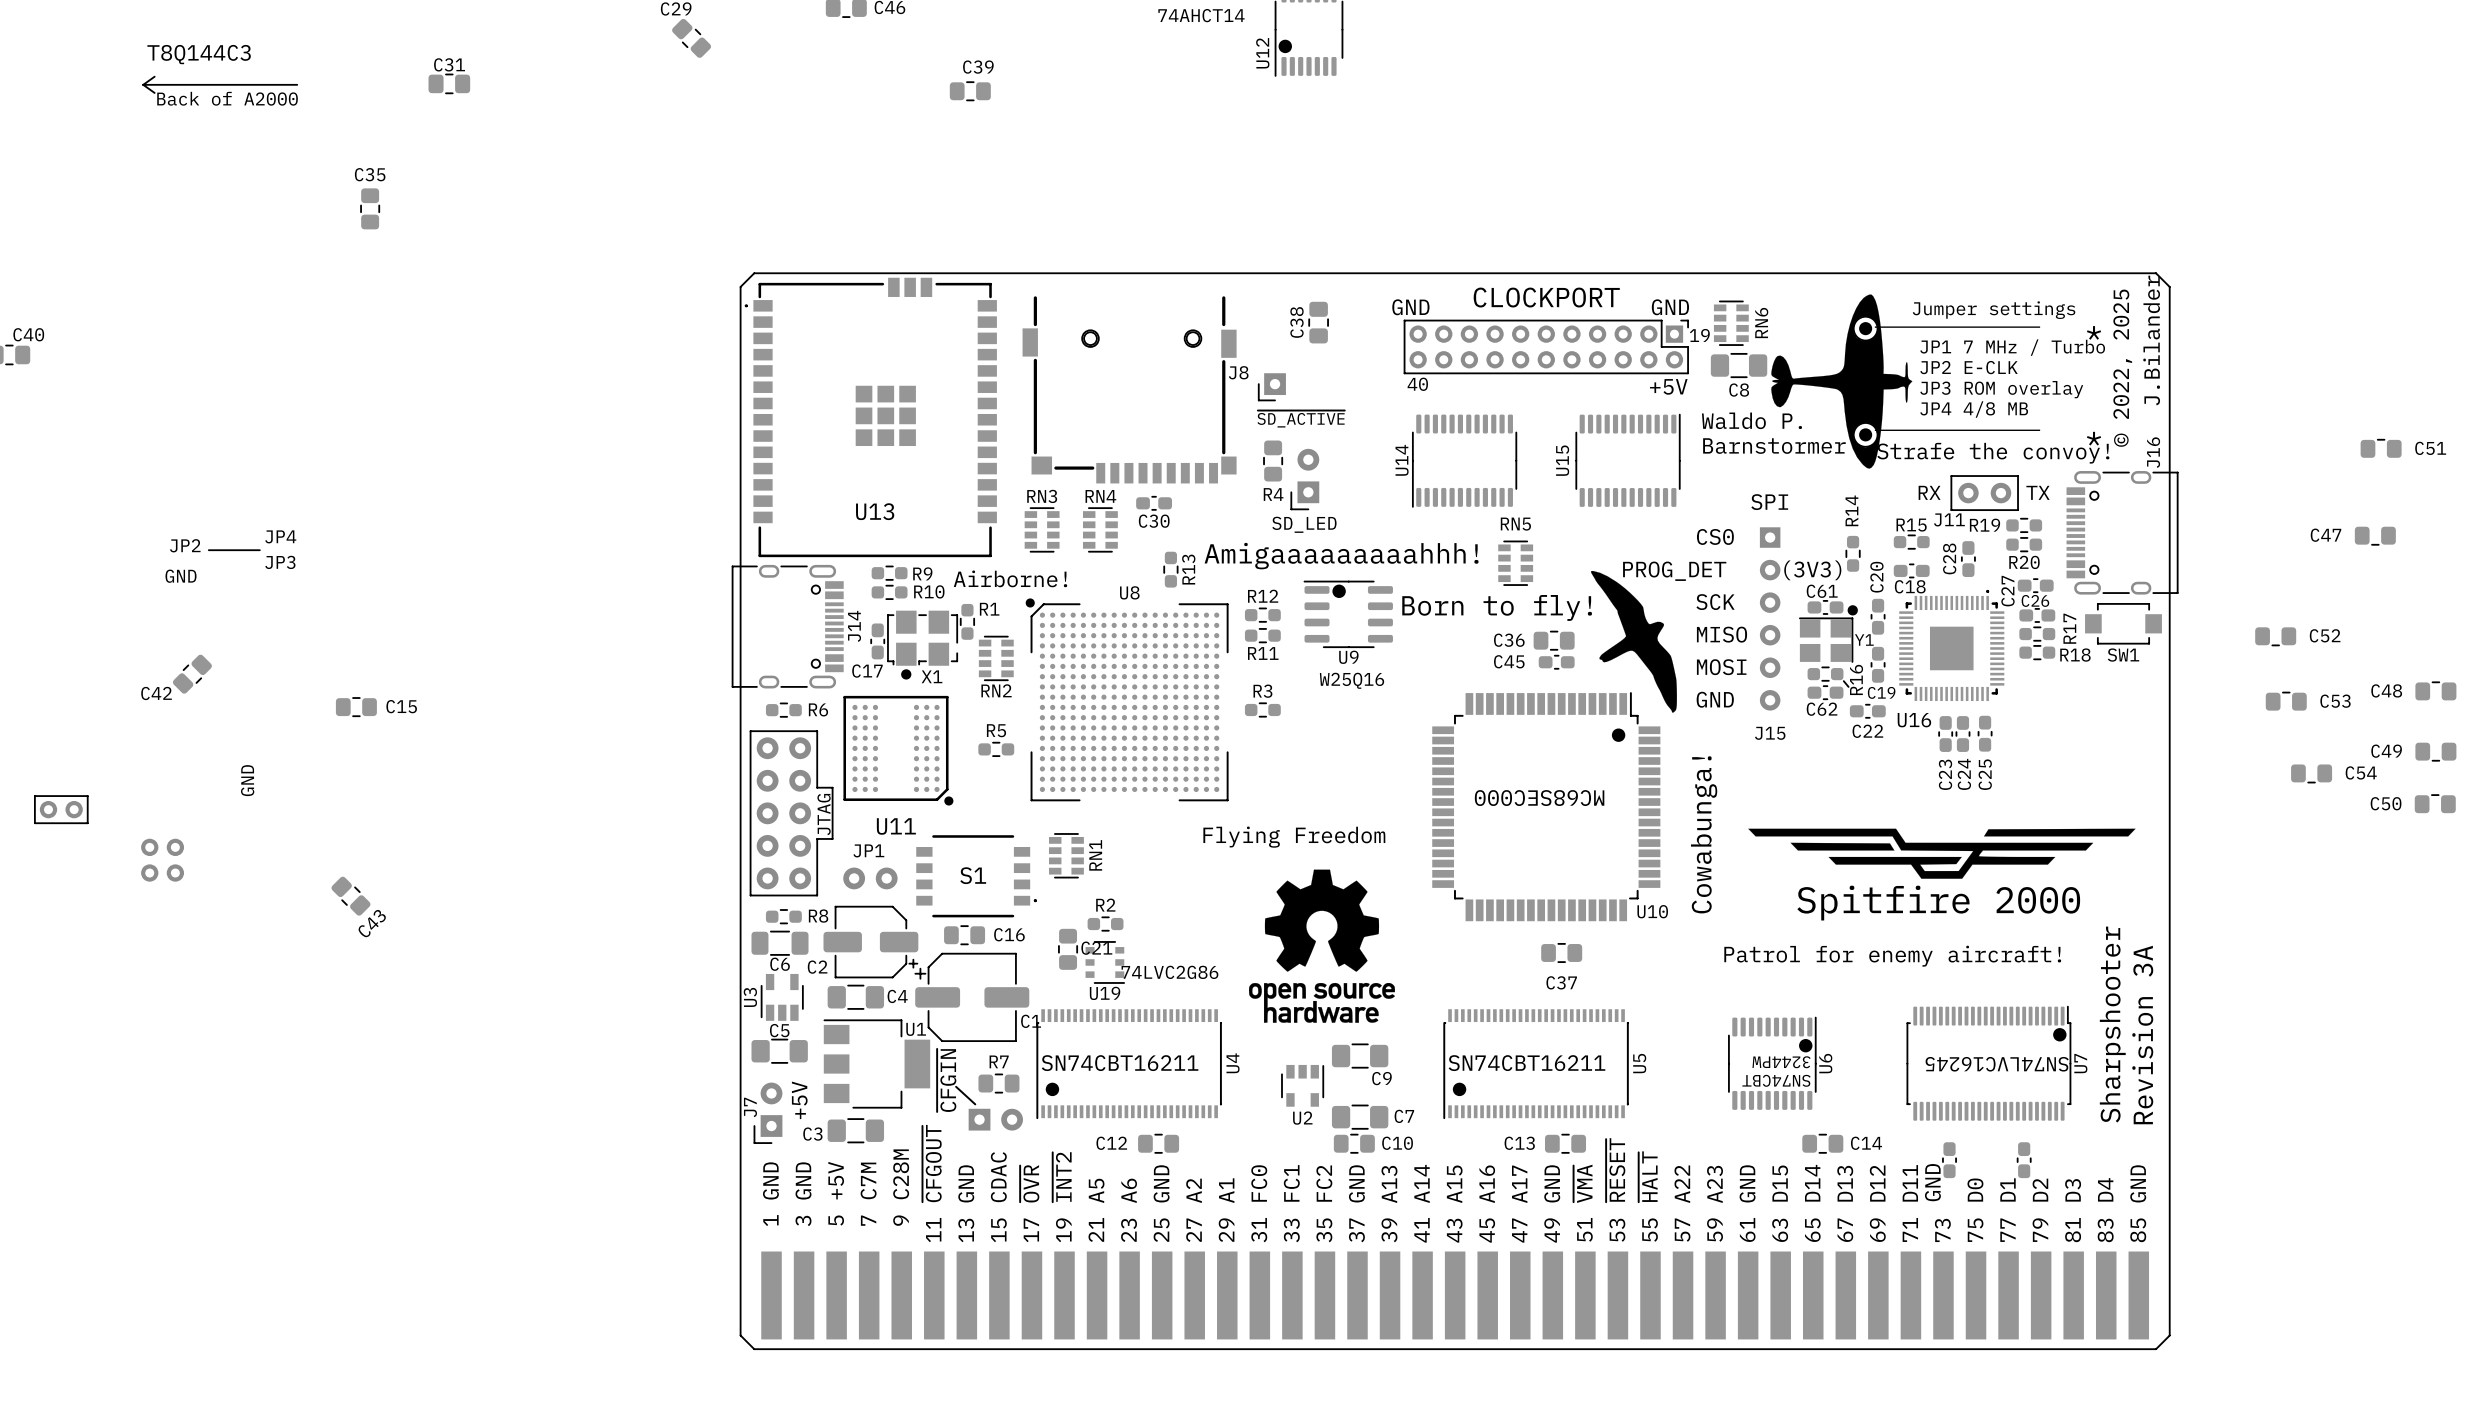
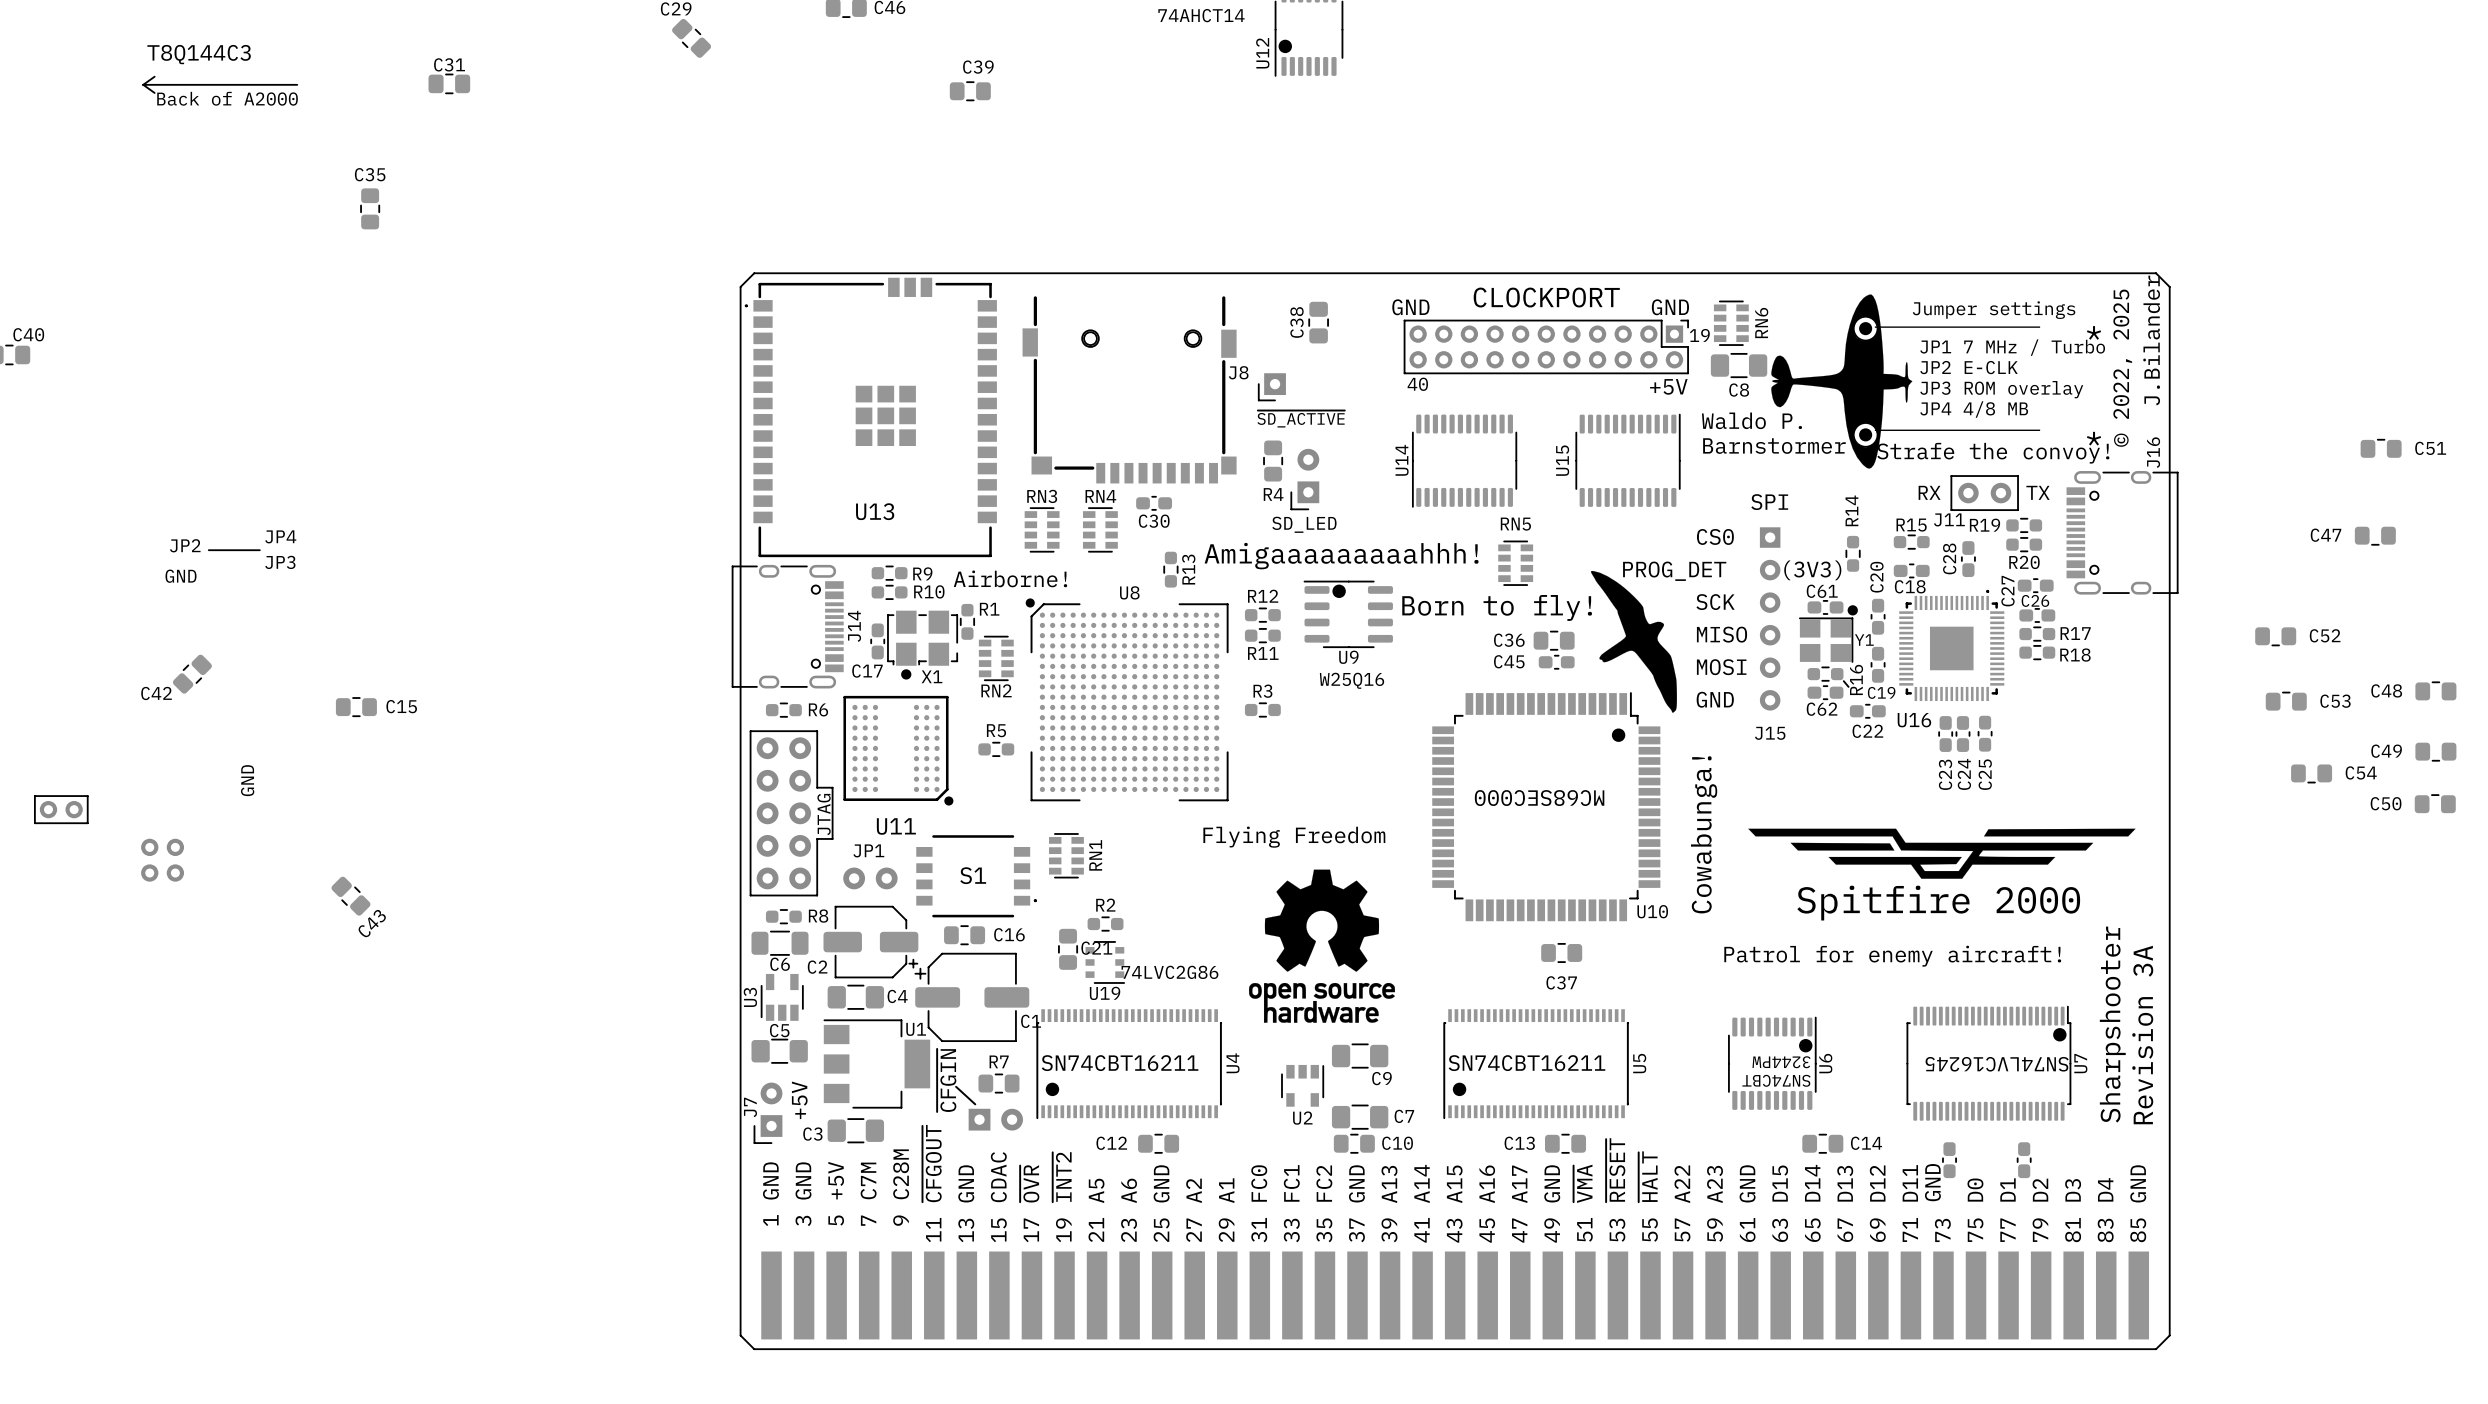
SW1: (2123, 623) -> none
R17 name rotation: 0° (2069, 628) -> 90° clockwise (2075, 633)

